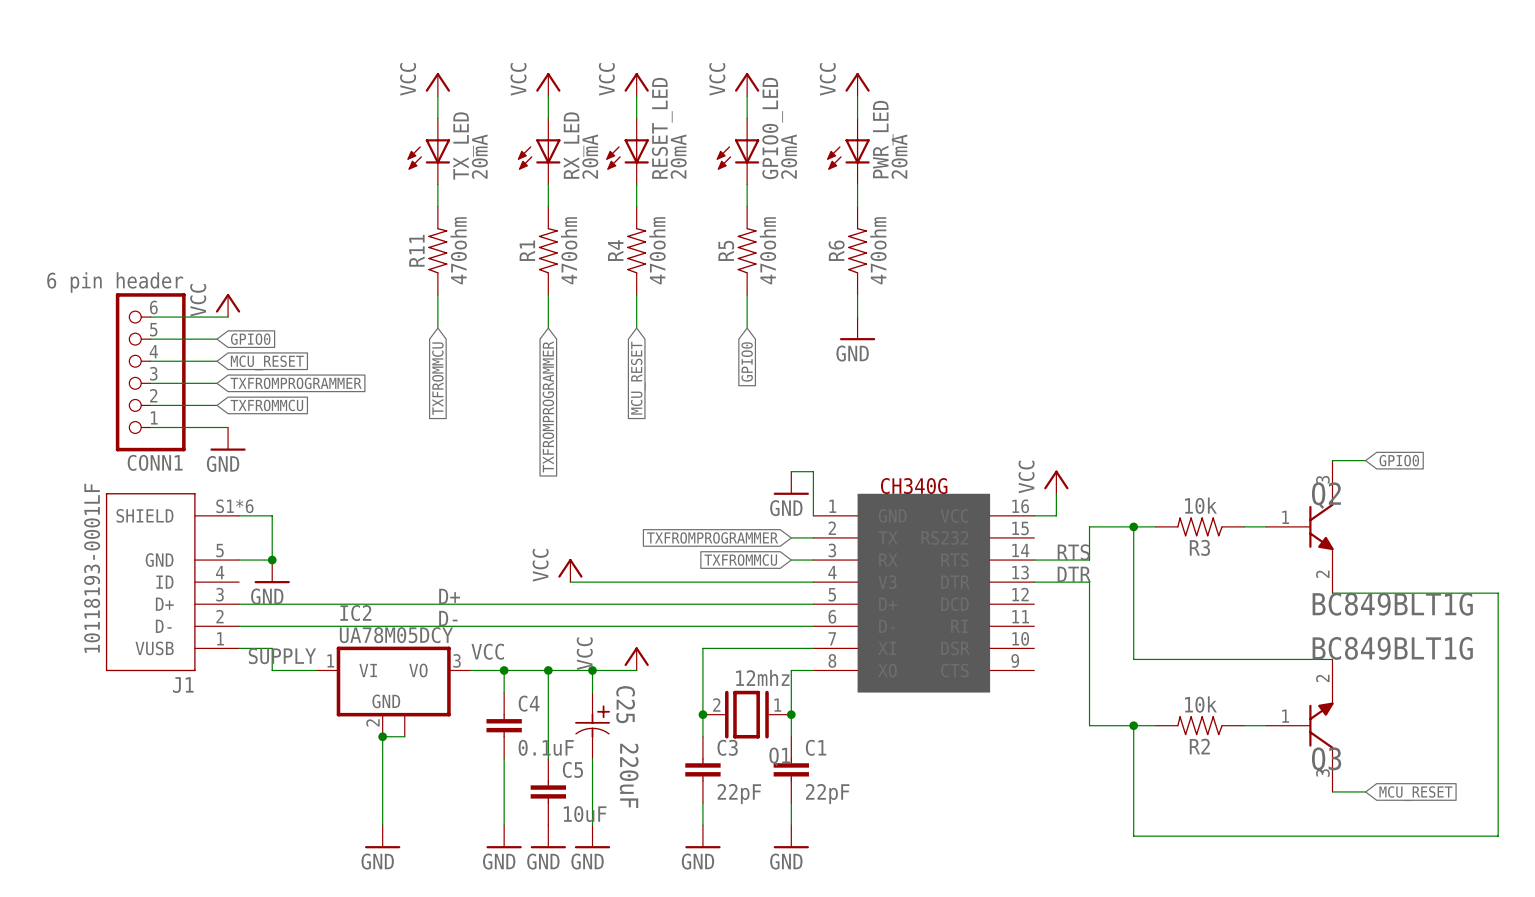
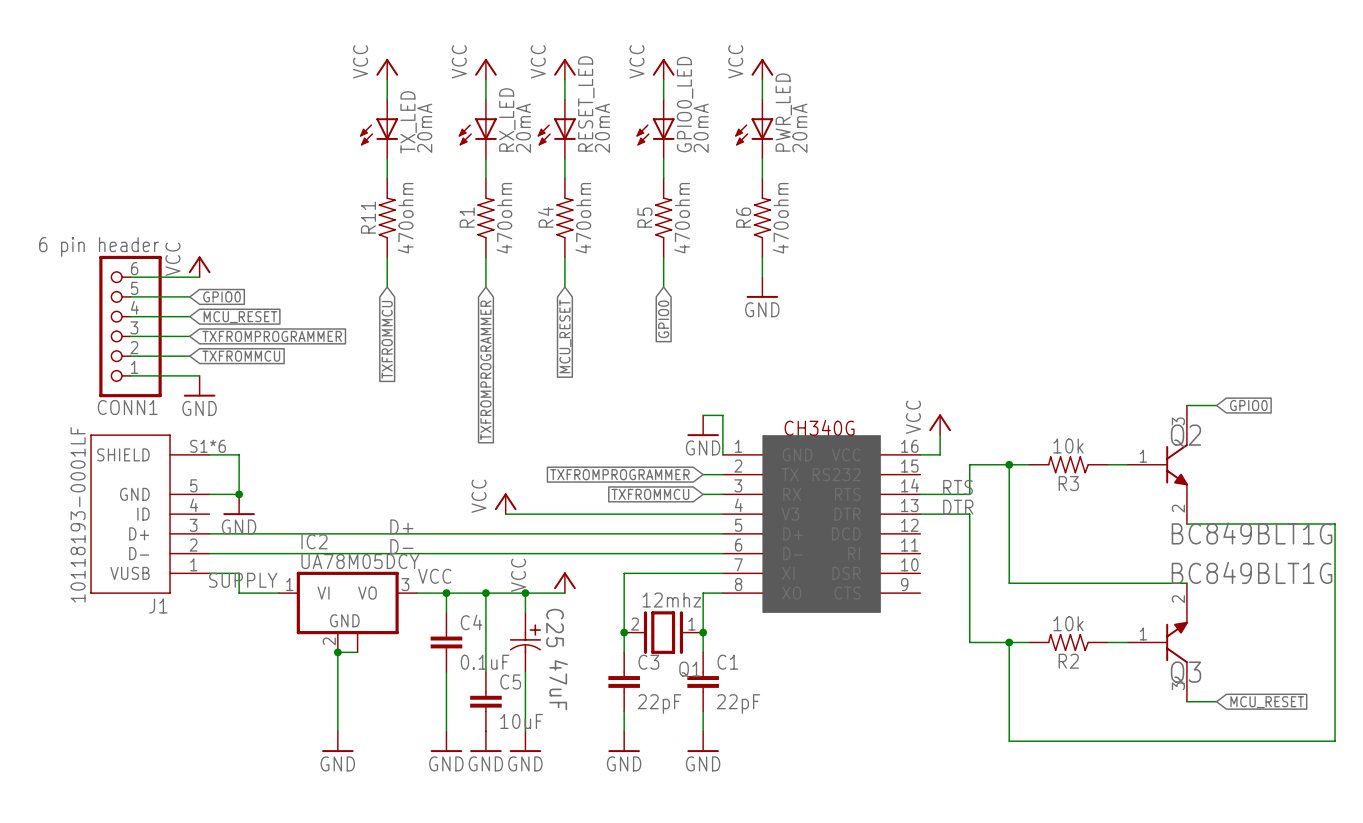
C25 value: 220uF (629, 775) -> 47uF (558, 685)

